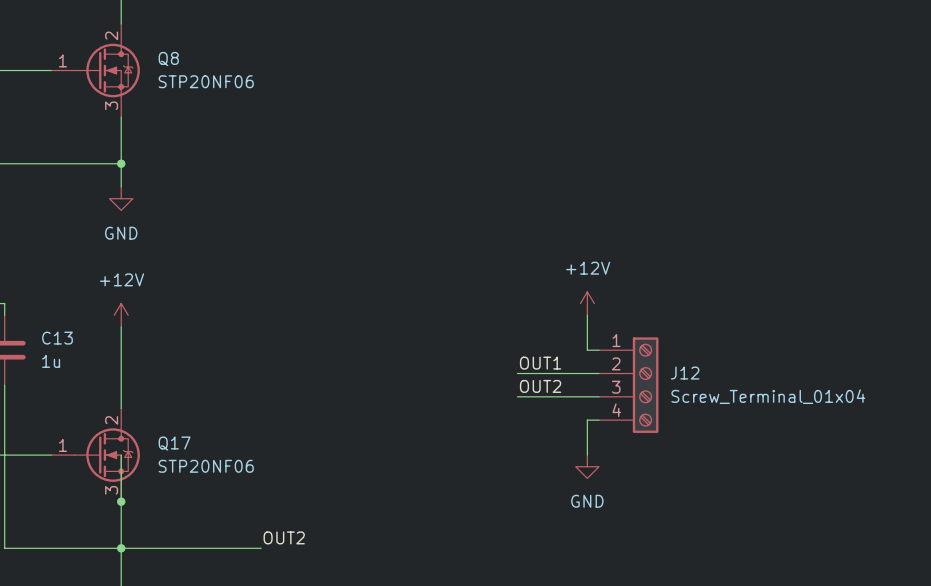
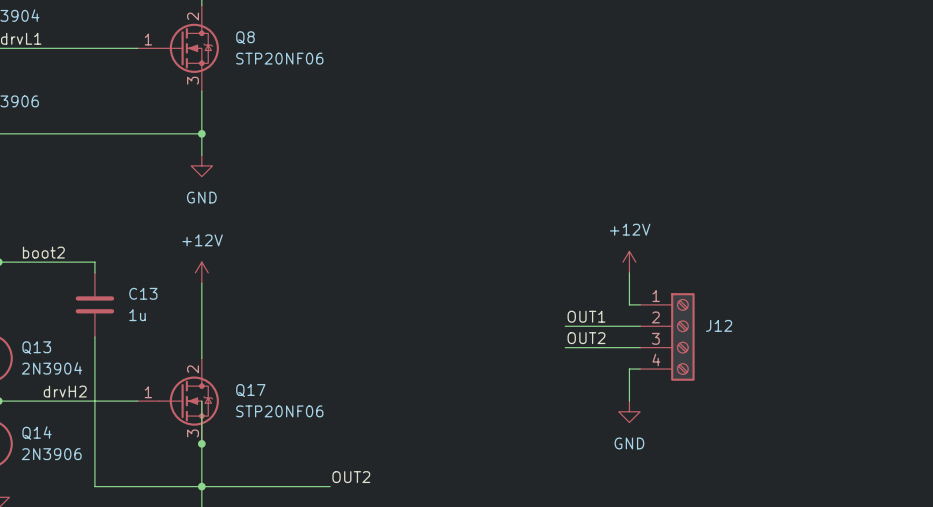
J12 value: Screw_Terminal_01x04 (768, 396) -> none

